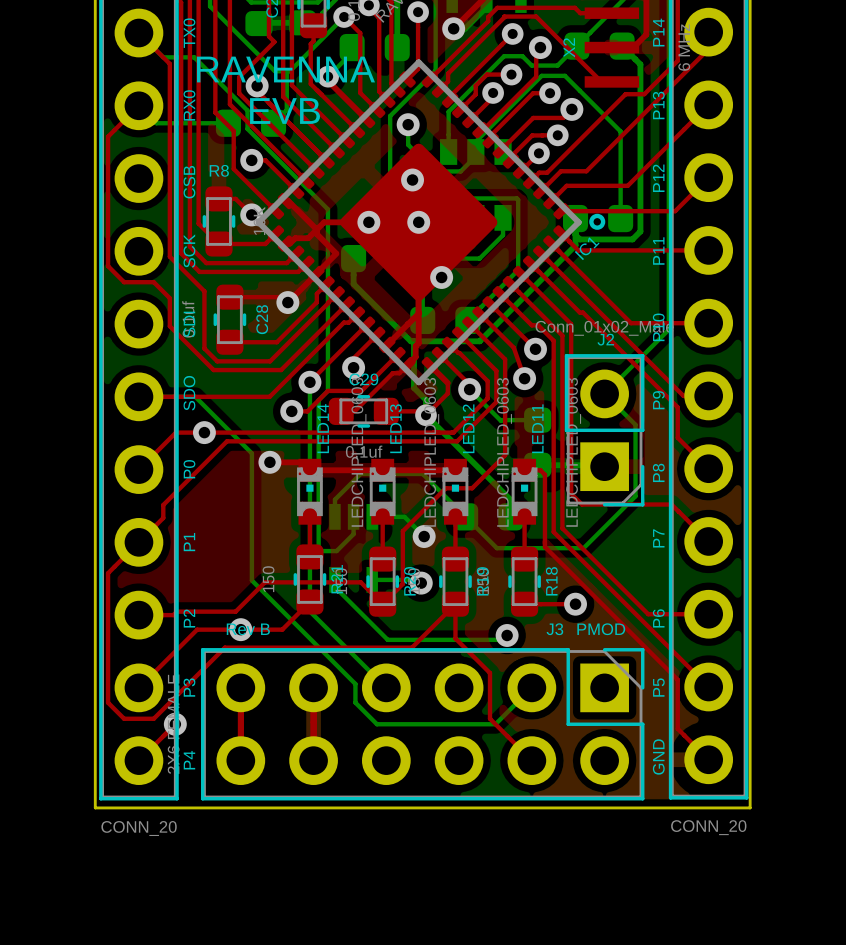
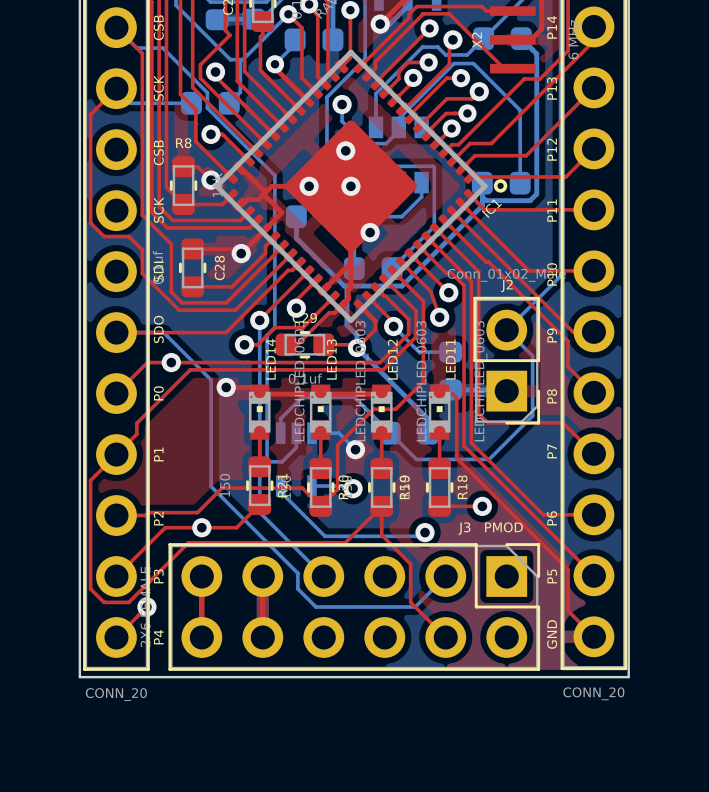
text: TX0 (189, 33) -> CSB (158, 27)
text: RAVENNA (285, 69) -> none
text: RX0 (189, 105) -> SCK (158, 88)
text: EVB (285, 111) -> none
text: Rev B (248, 629) -> none

